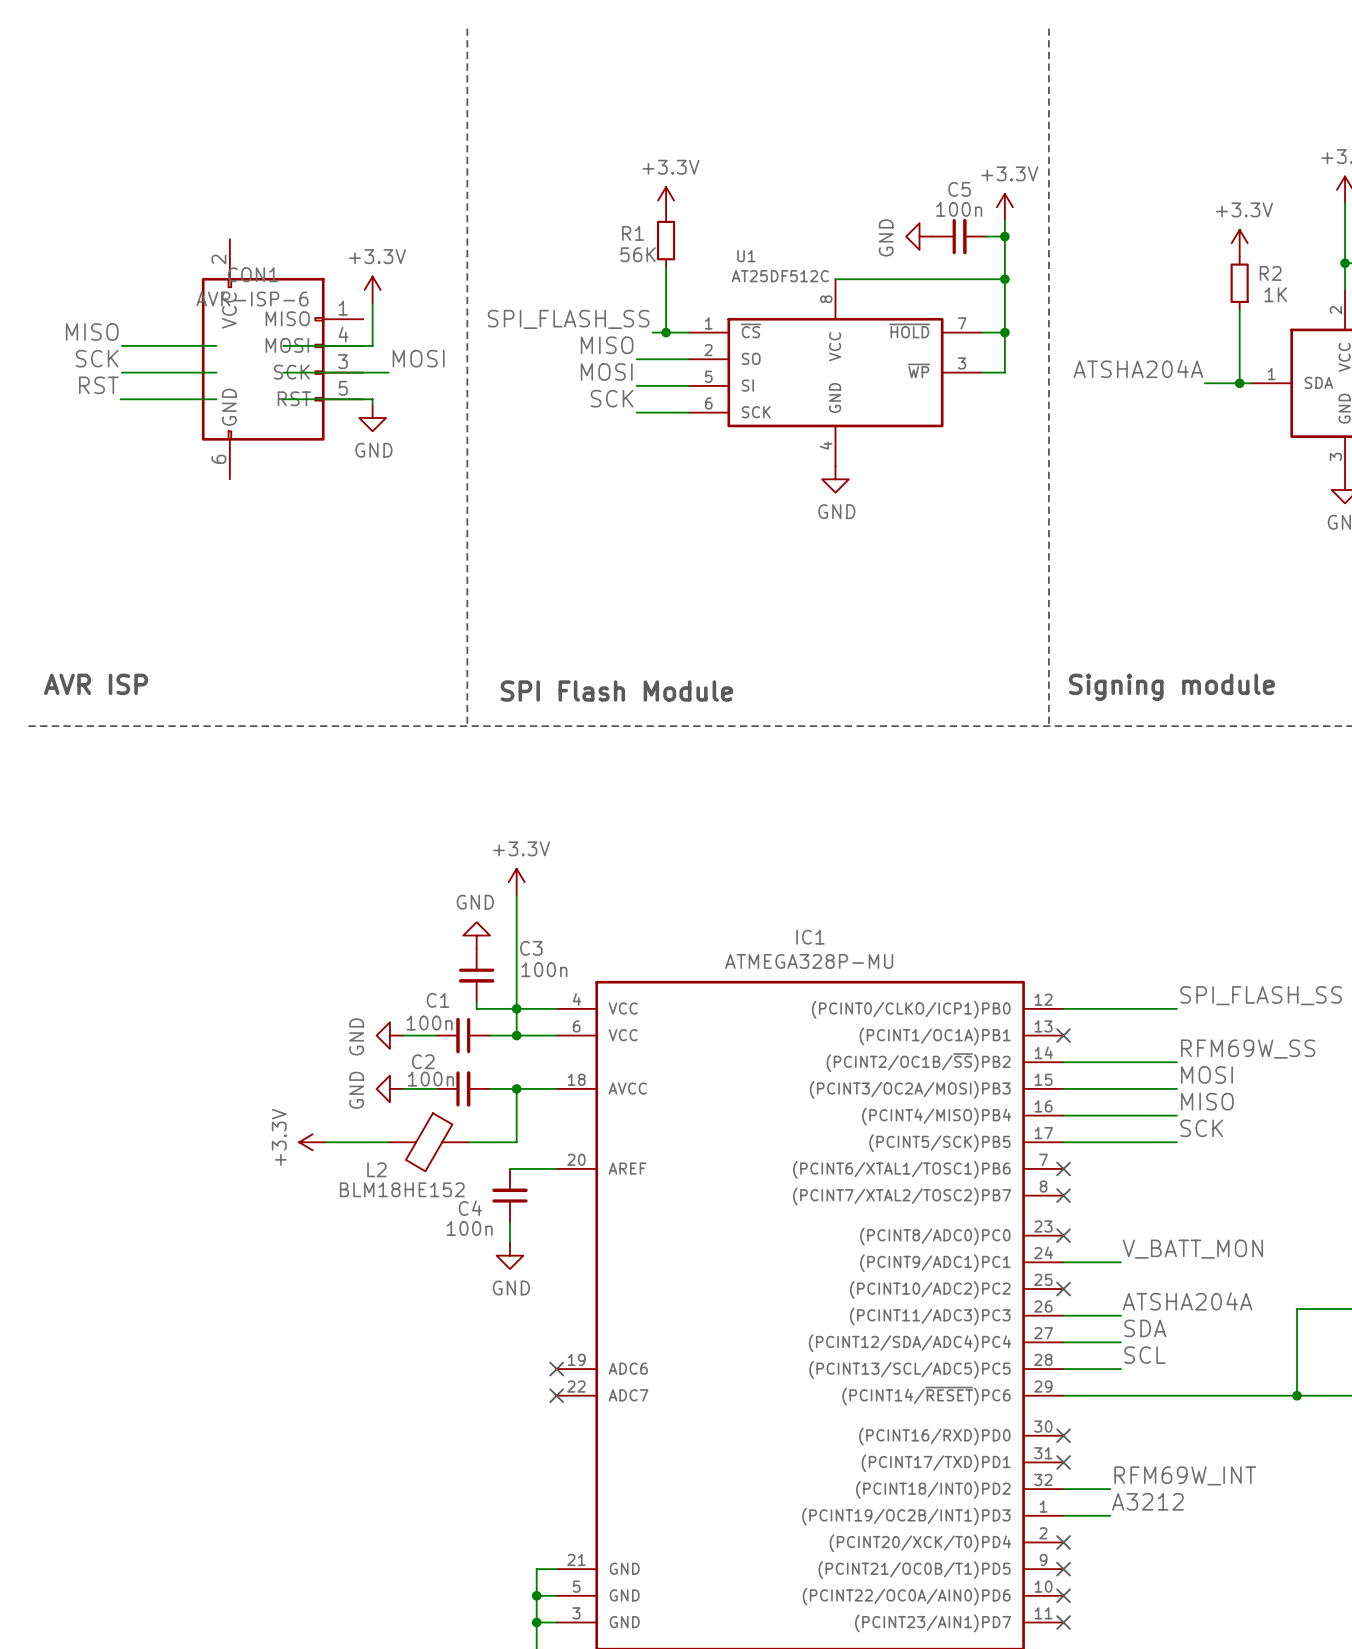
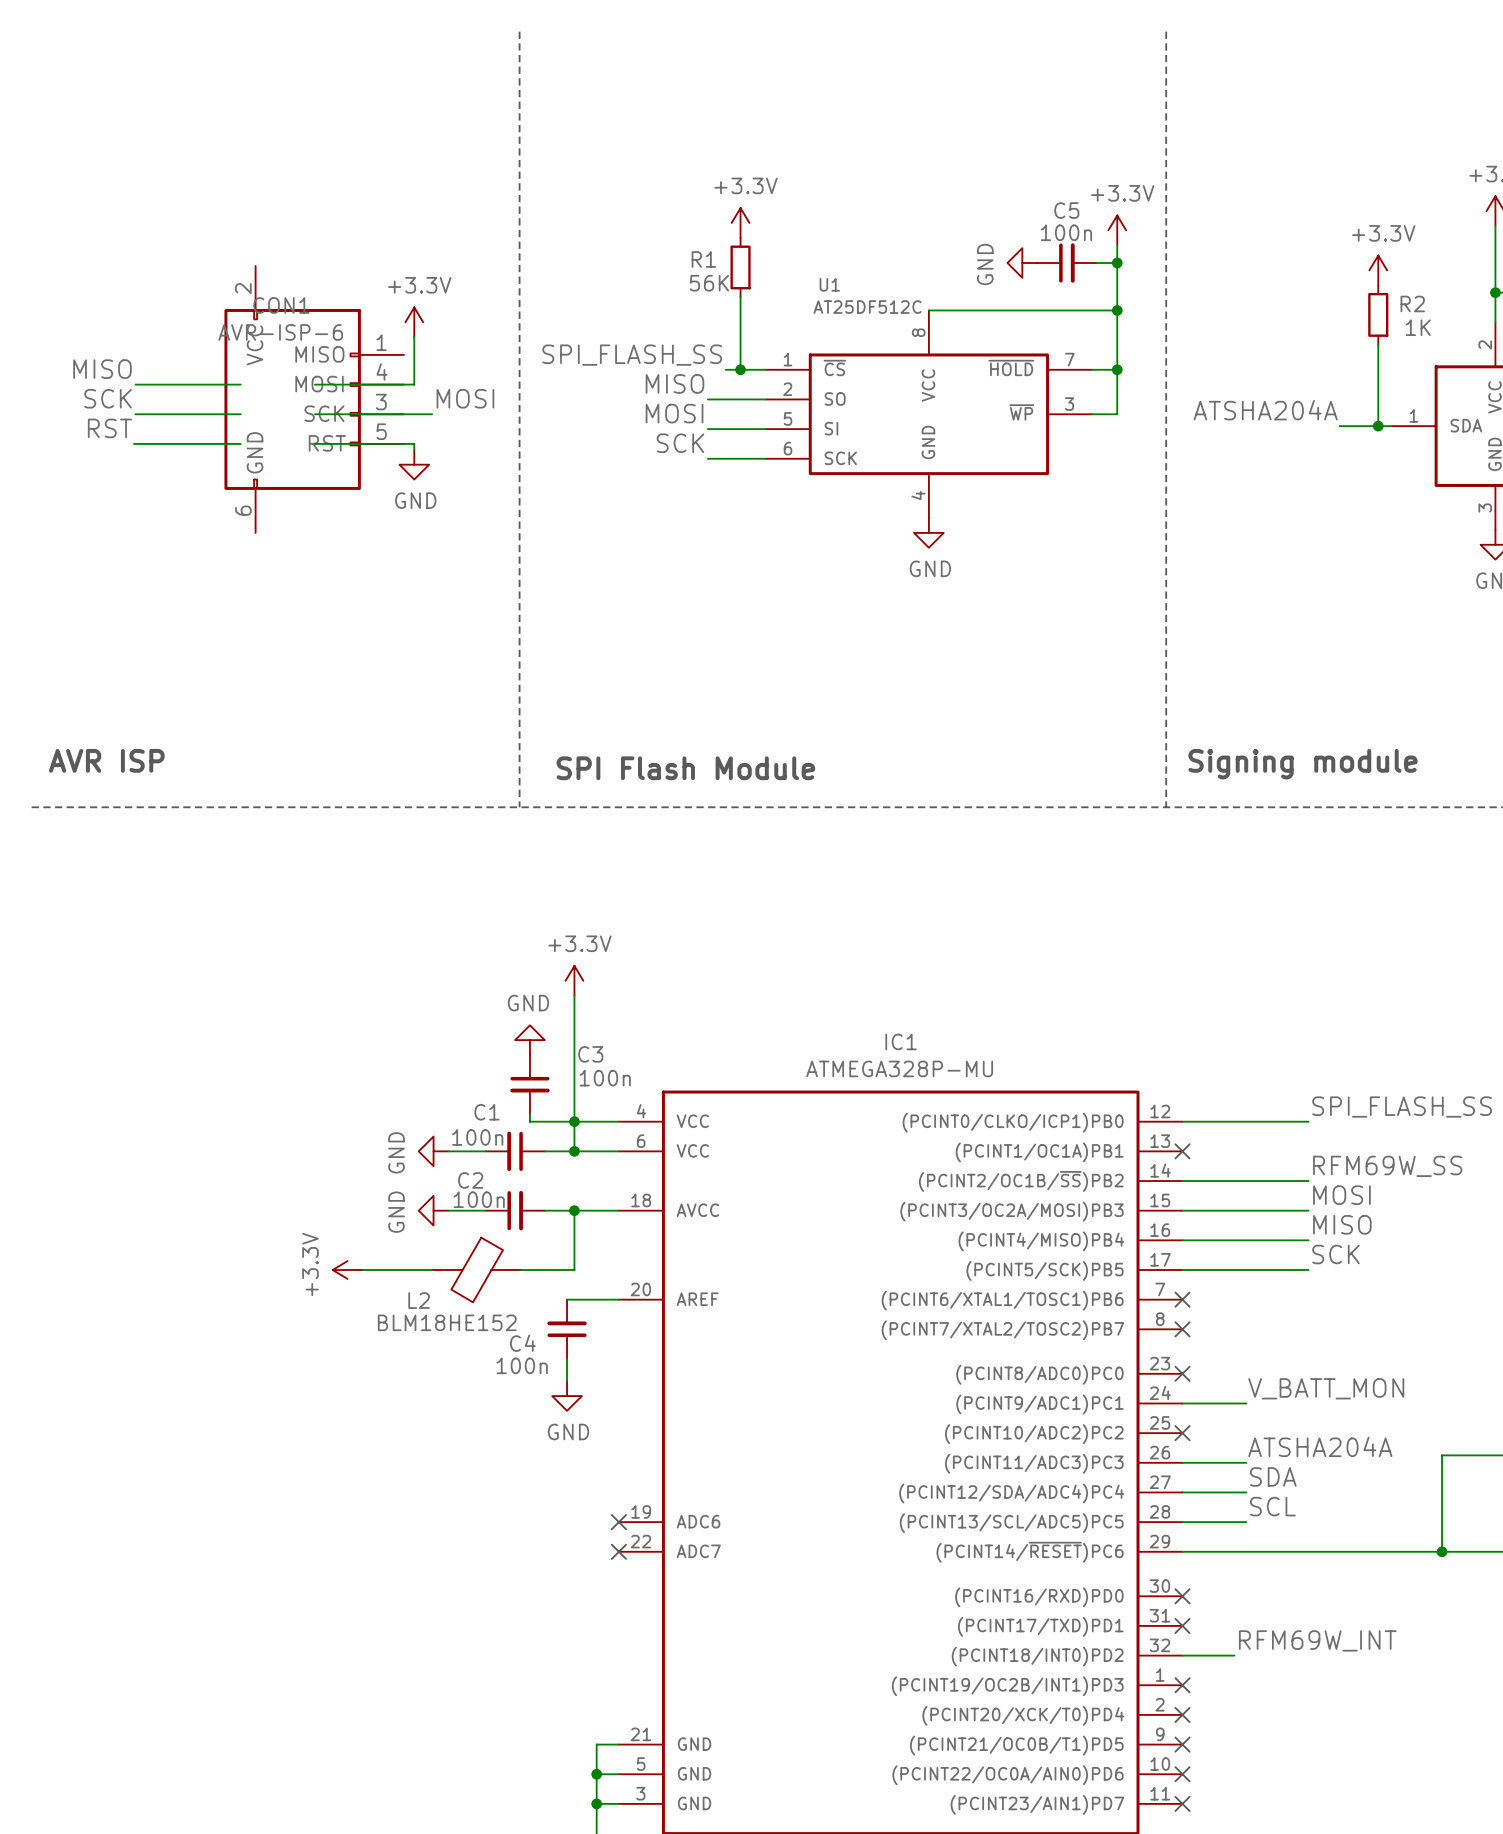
label: A3212 (1147, 1501) -> none
wire: (1063, 1515) (1110, 1515) -> none
no-connect mark: none -> (1182, 1685)

